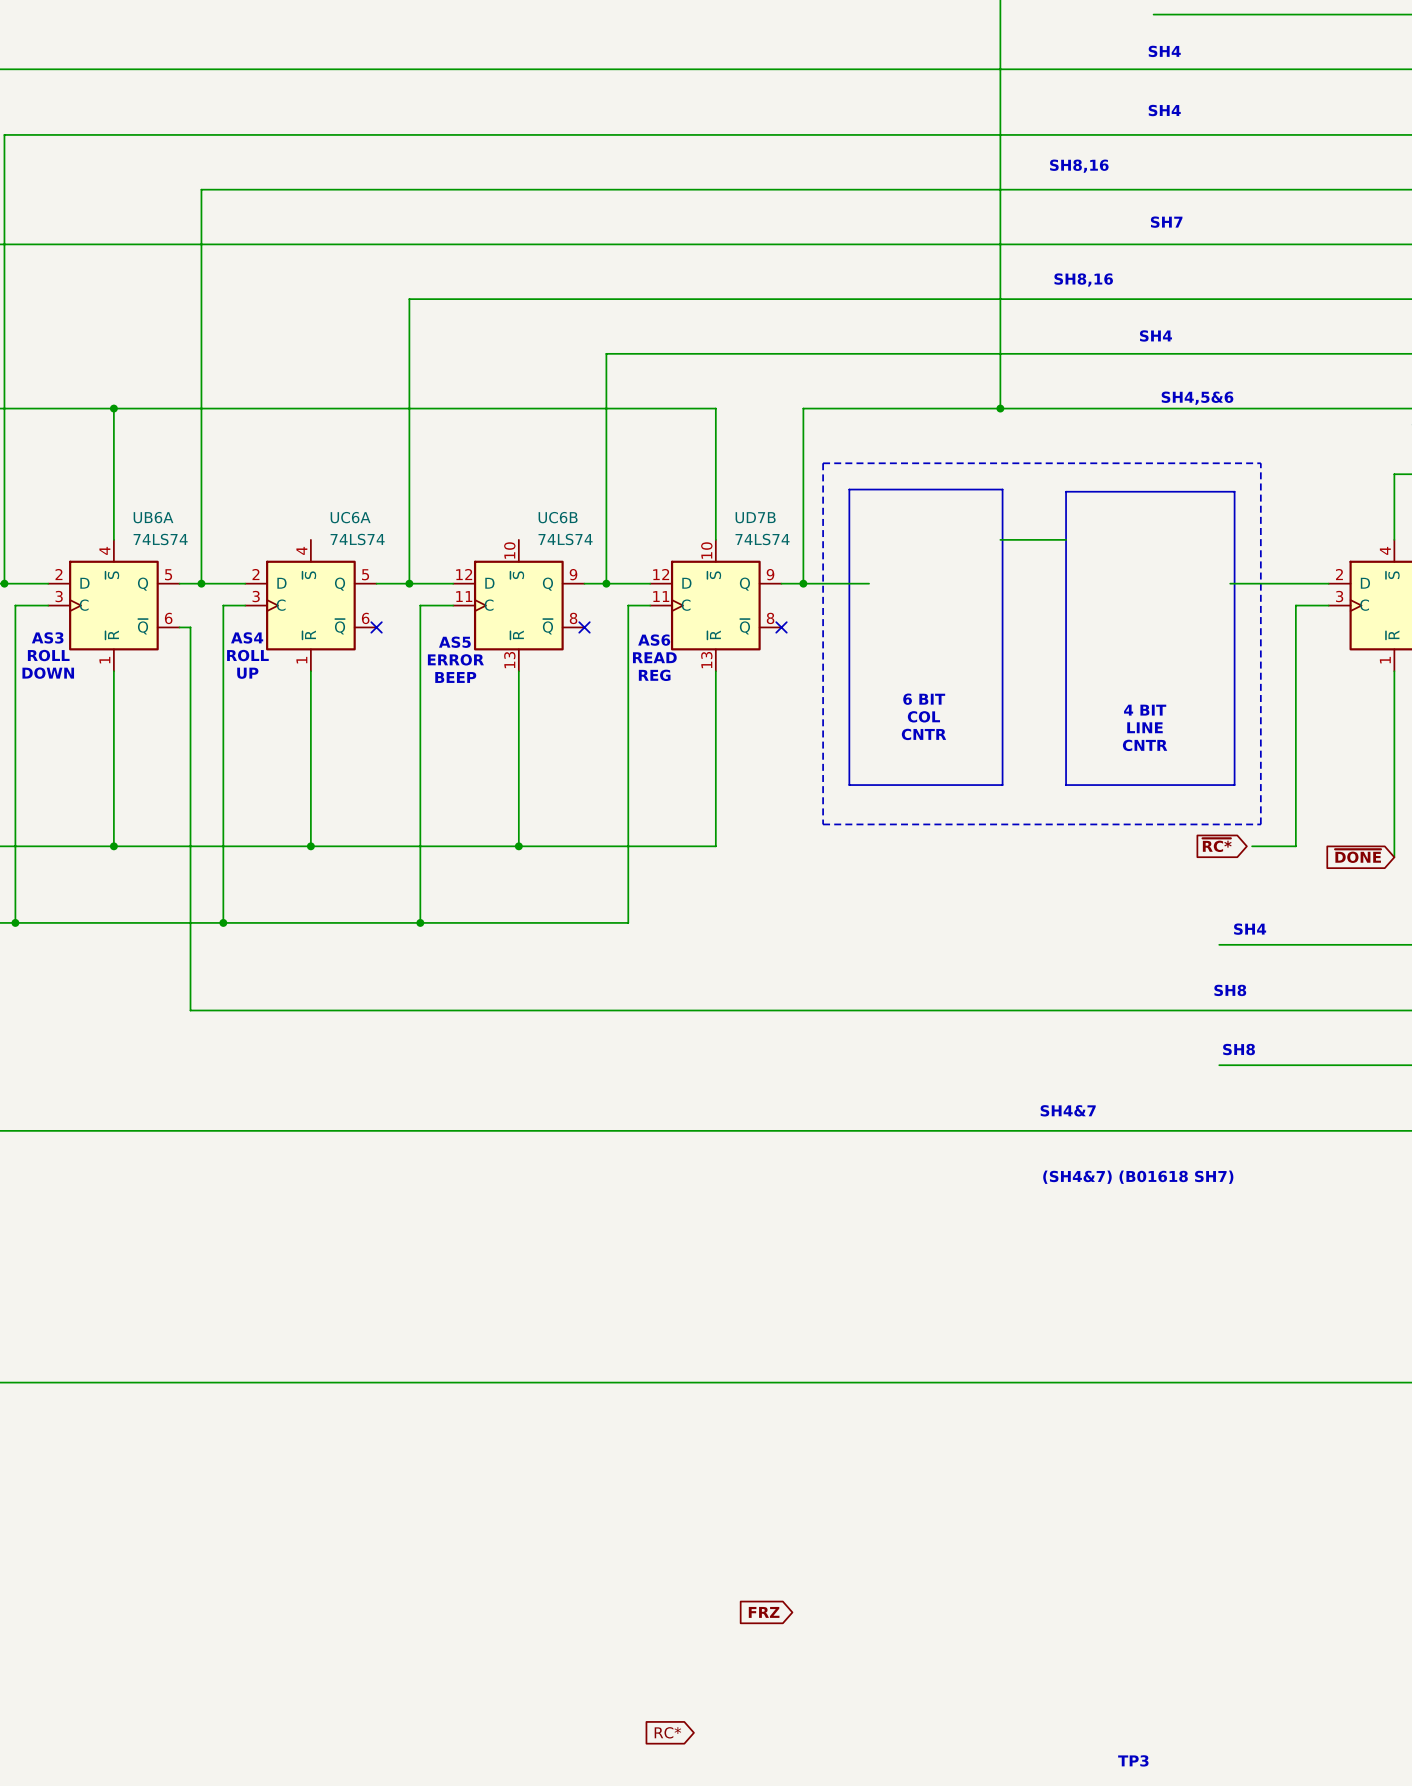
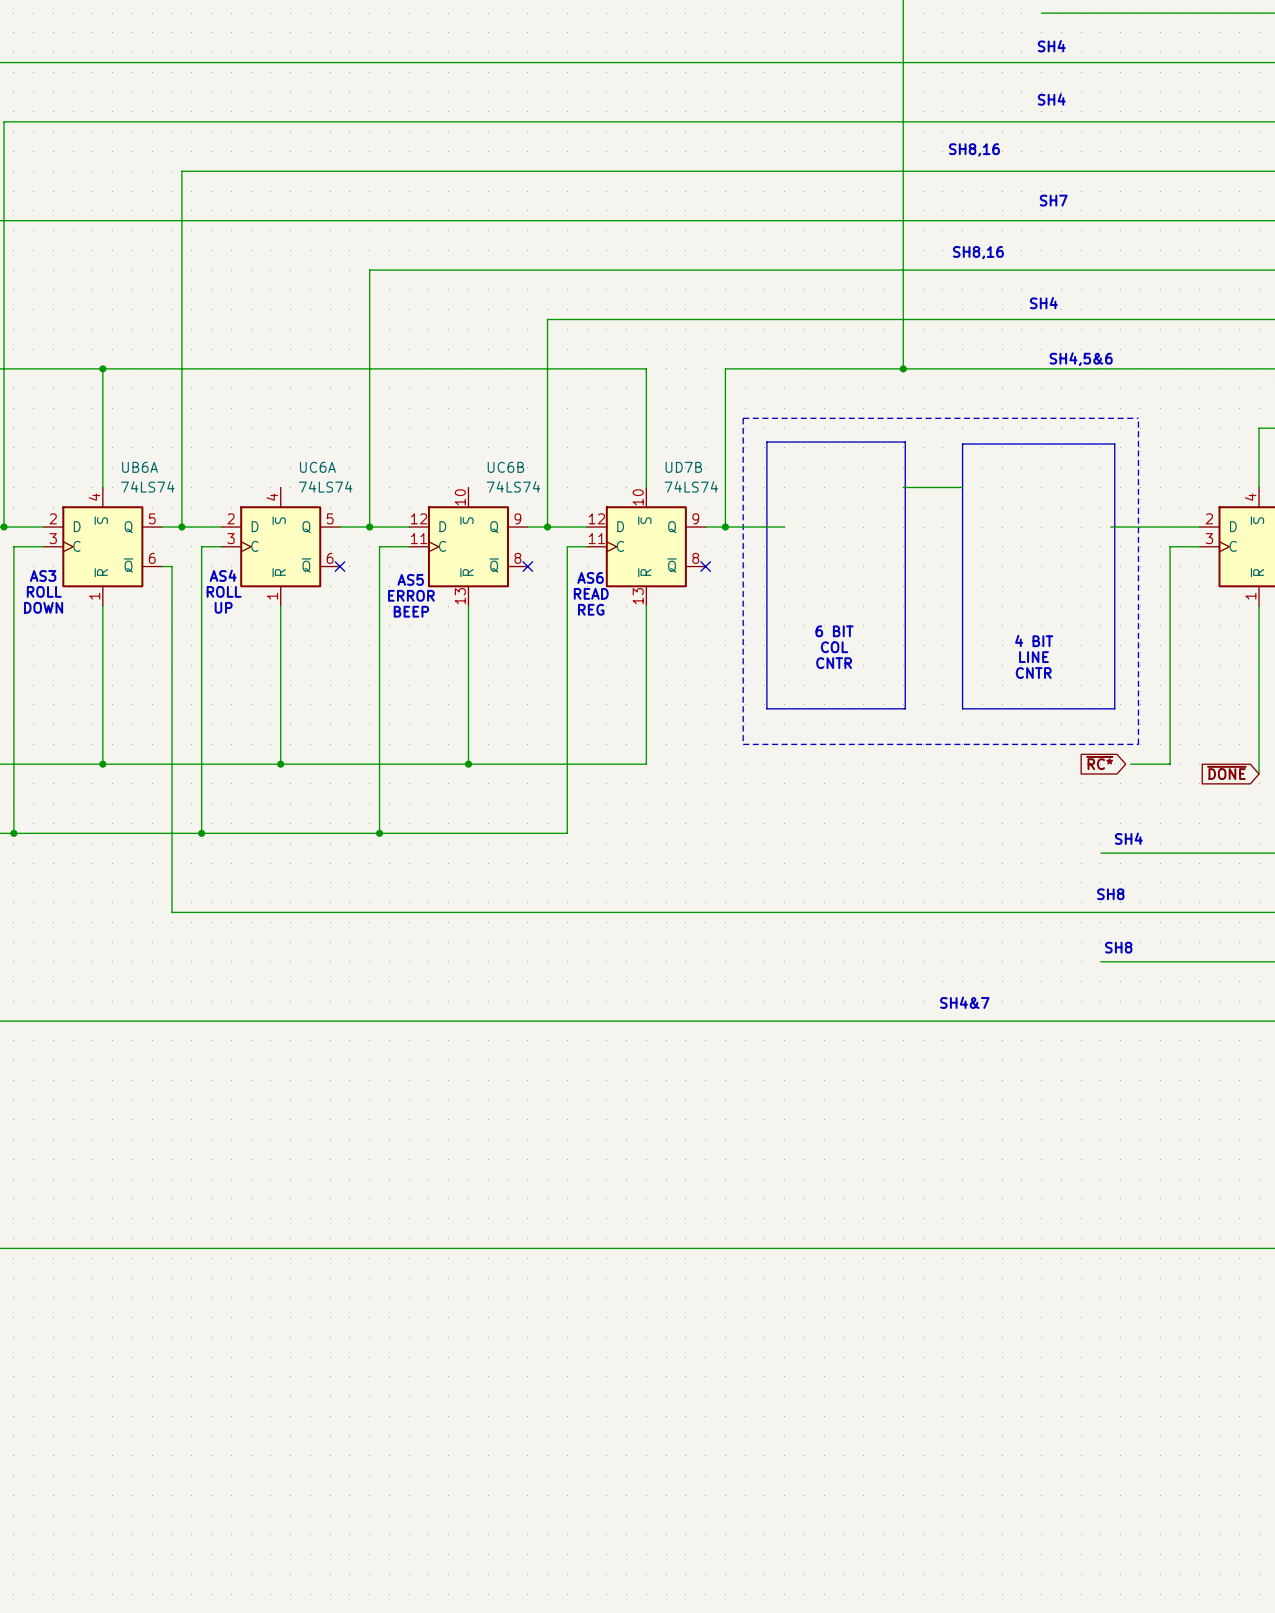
text: (SH4&7) (B01618 SH7) (1138, 1177) -> none
global label: FRZ (764, 1612) -> none
global label: RC* (667, 1732) -> none
text: TP3 (1133, 1760) -> none

